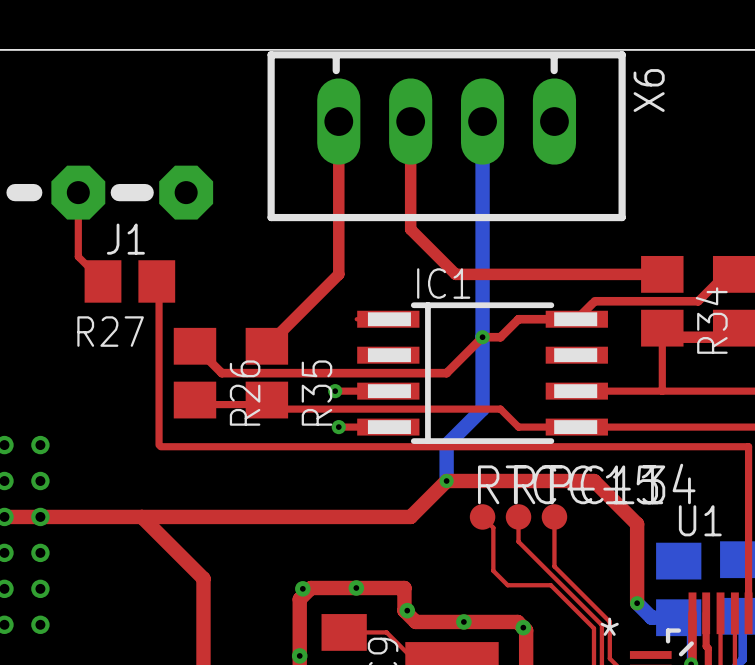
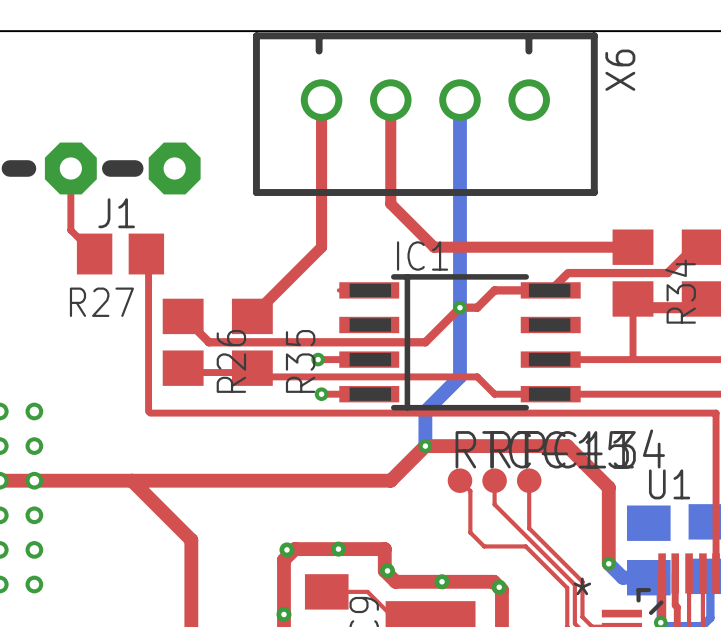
X6 footprint: [267, 51, 626, 222] -> [252, 32, 598, 196]

